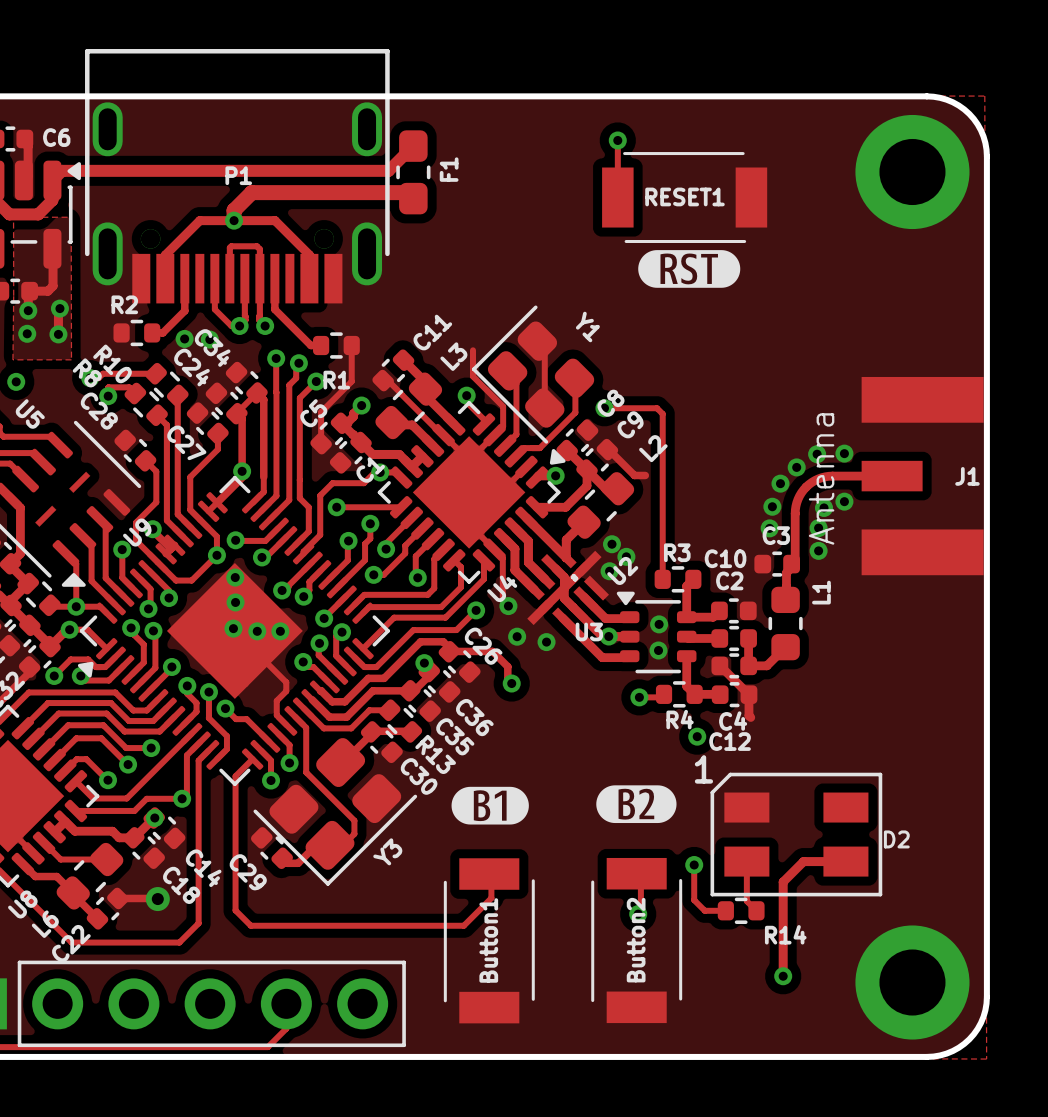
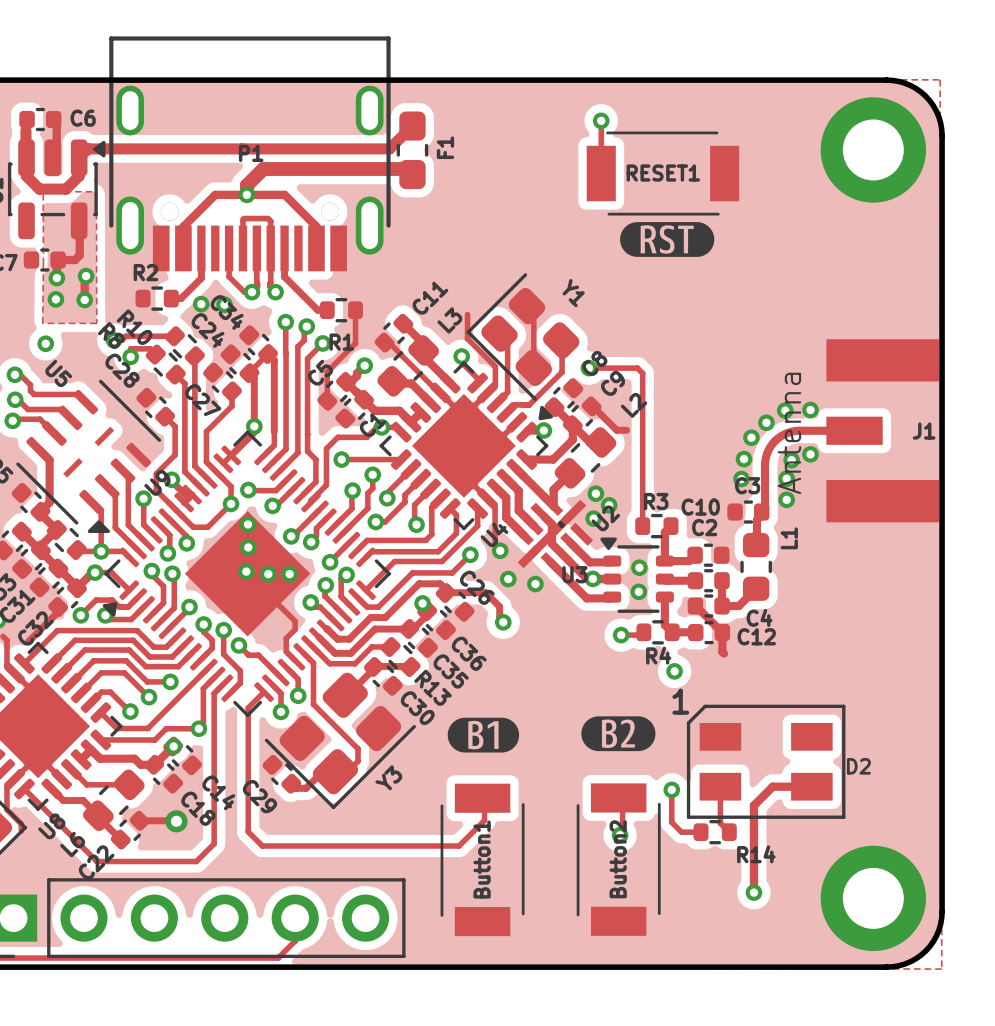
C4 name position: C4 (733, 721) -> C4 (759, 617)
C12 name position: C12 (730, 741) -> C12 (756, 636)

